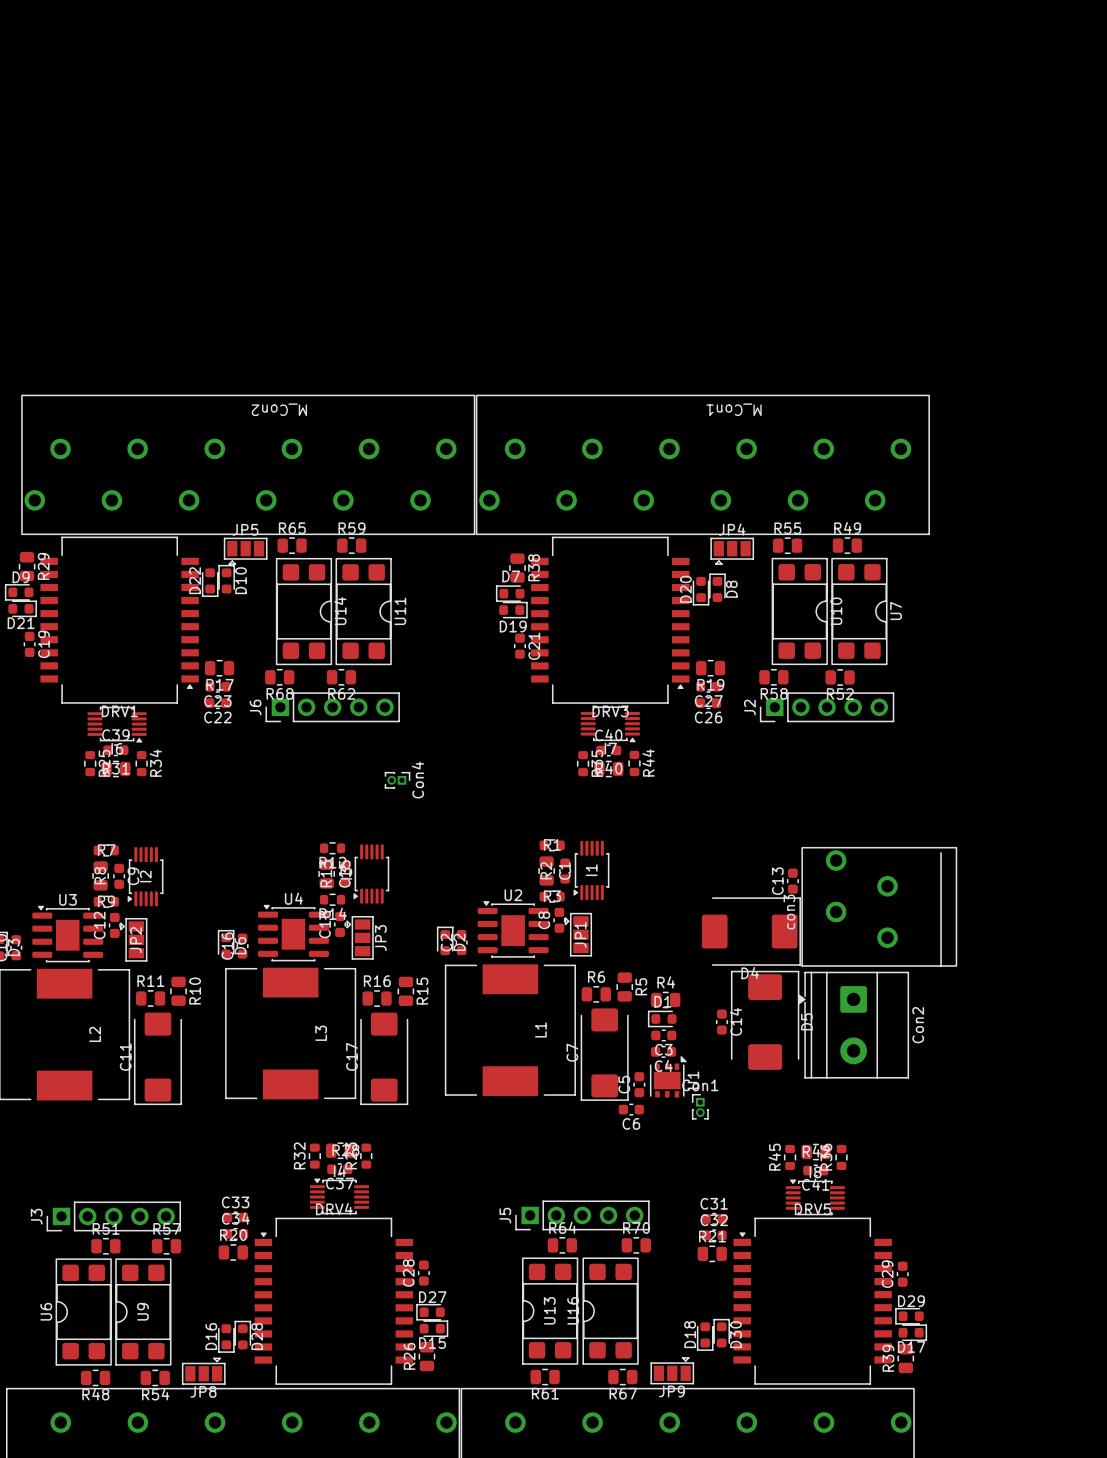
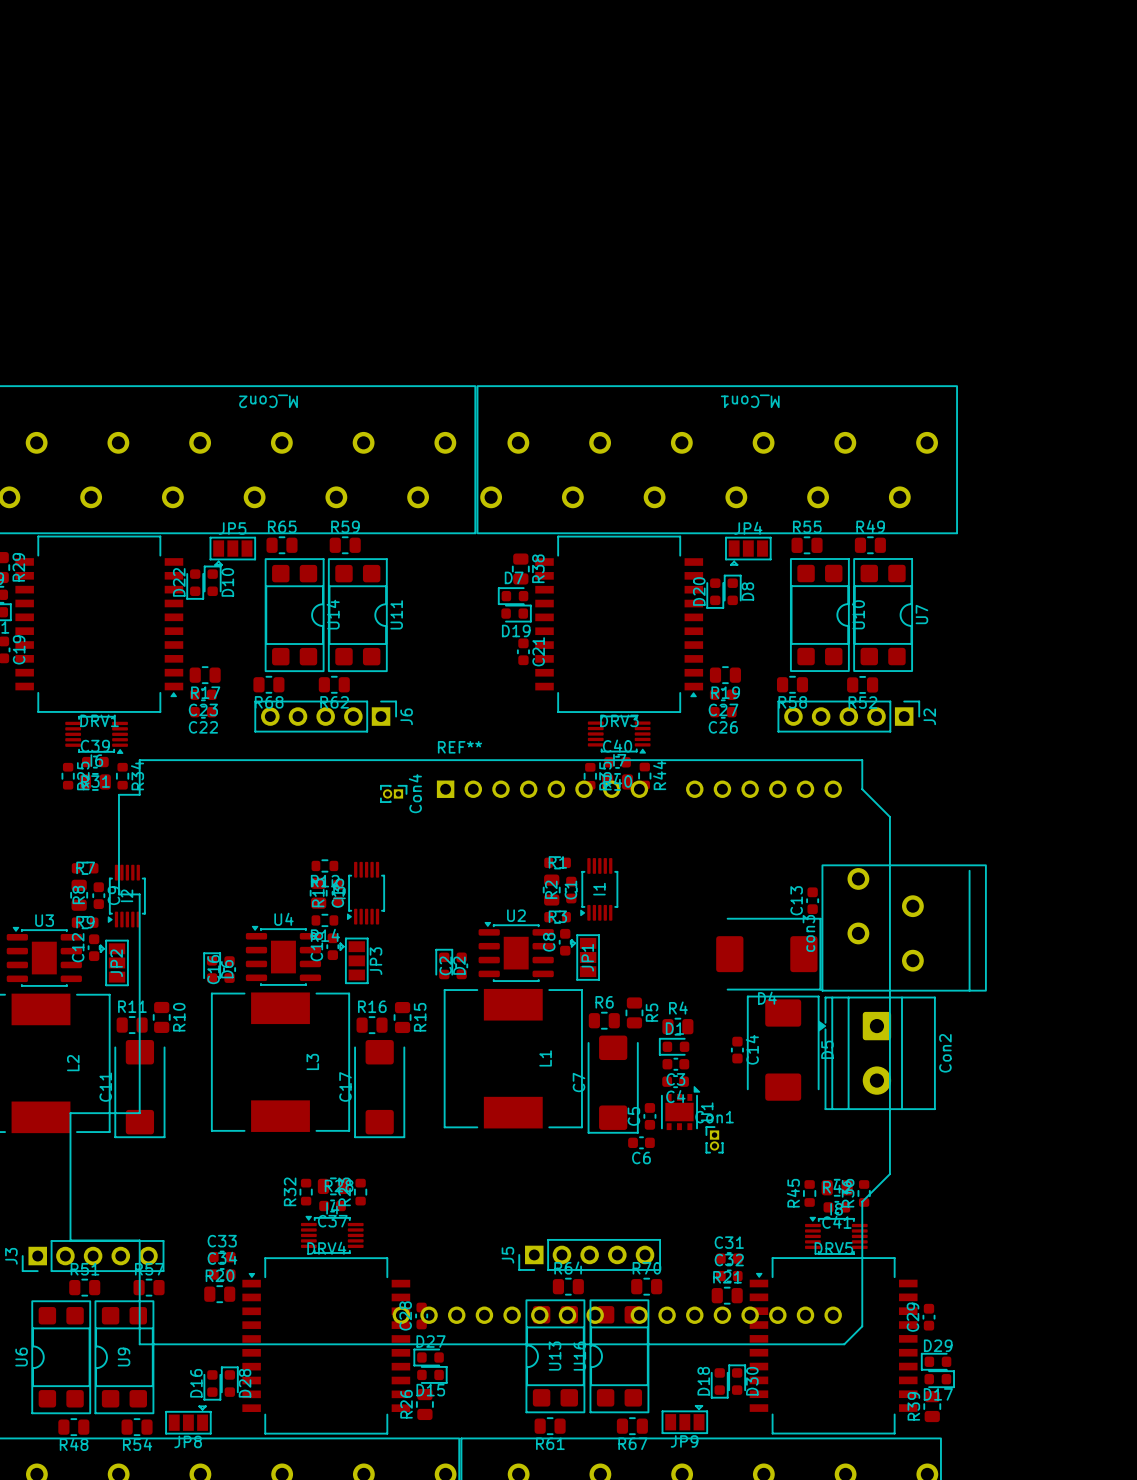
J6 rotation: 0° (332, 707) -> 180° (325, 716)
J2 rotation: 0° (827, 707) -> 180° (848, 716)
REF**: none -> (480, 1052)

